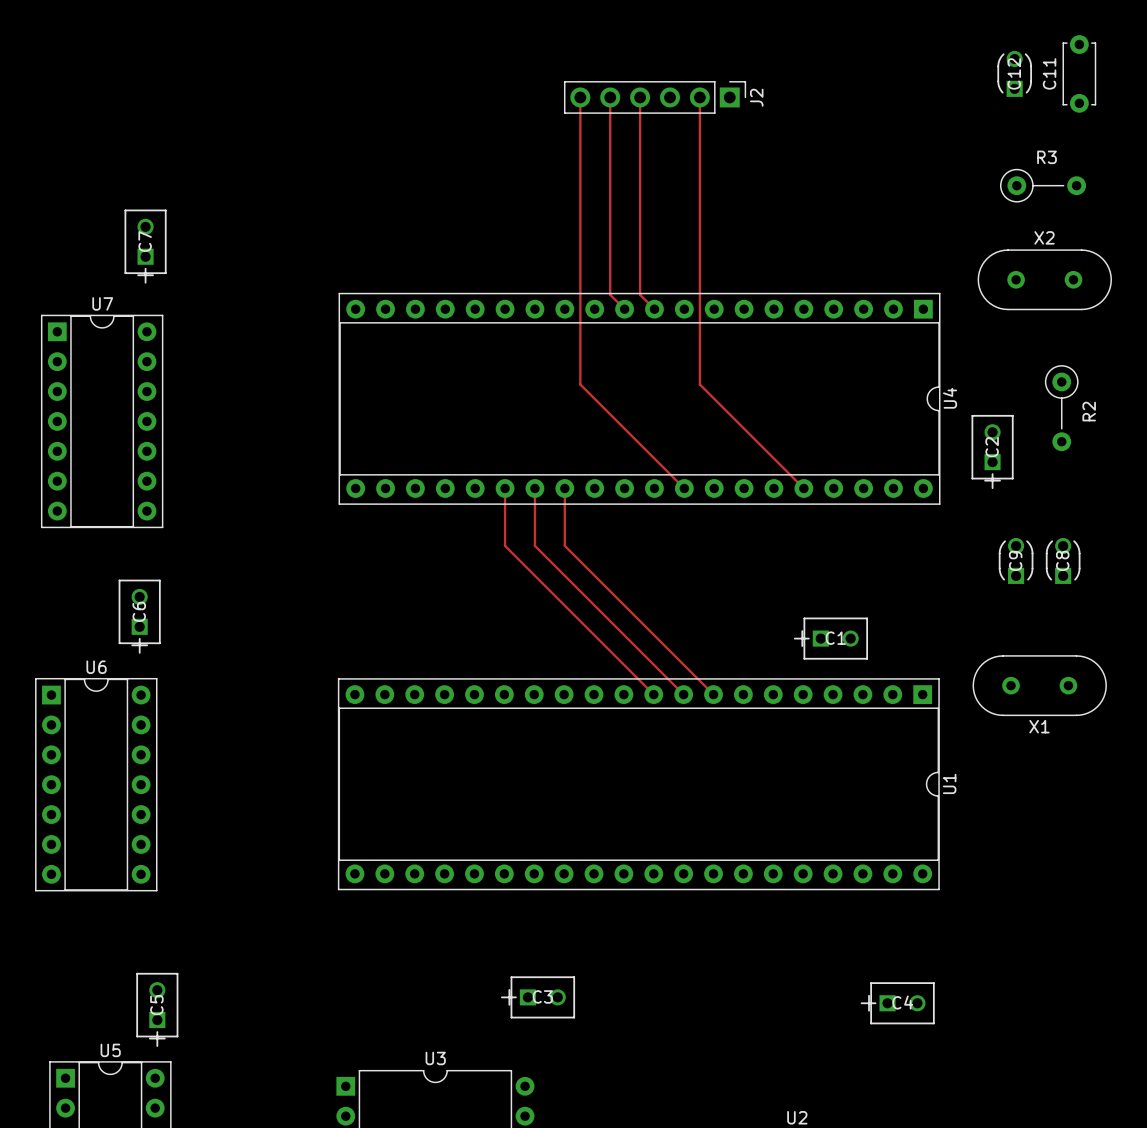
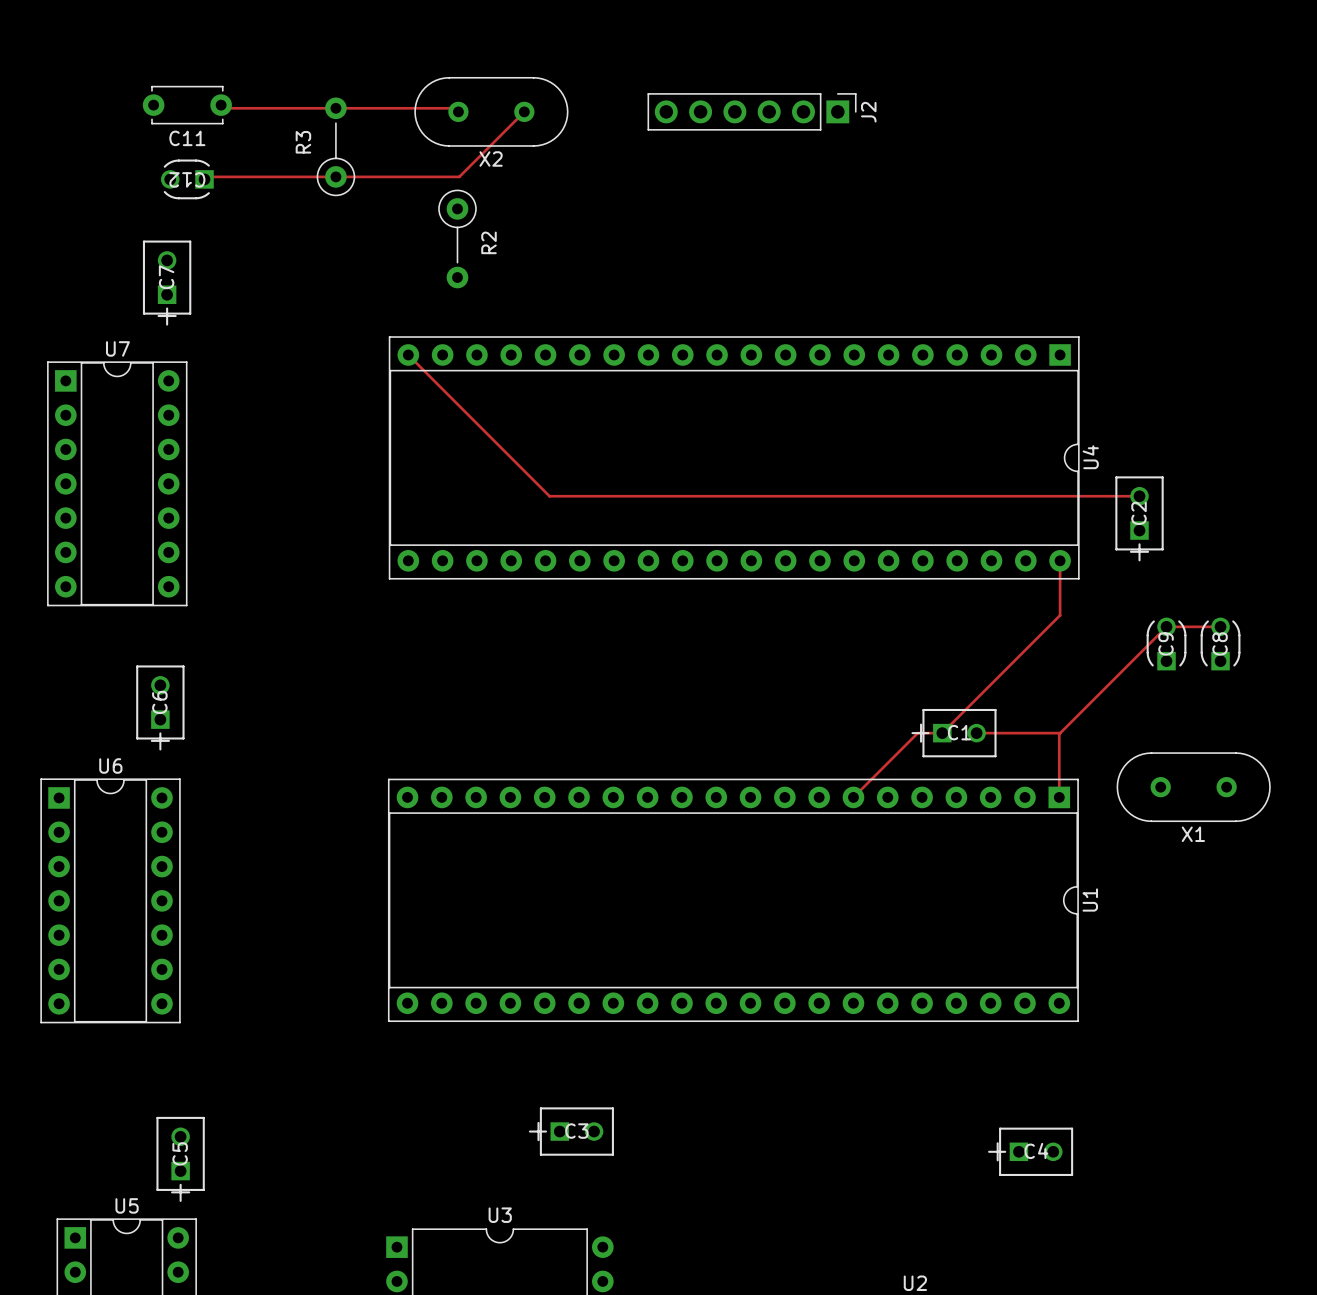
C12 rotation: 0° (1014, 73) -> 90° counterclockwise (187, 179)
C12 position: (1014, 73) -> (187, 179)
C11 name position: C11 (1049, 73) -> C11 (187, 138)
C11 rotation: 0° (1079, 73) -> 90° clockwise (187, 105)
C11 position: (1079, 73) -> (187, 105)
track: none -> (221, 105) (224, 108) (454, 108) (458, 111)
track: none -> (524, 111) (459, 176) (207, 176) (204, 179)
track: (580, 97) (580, 384) (684, 488) -> none
track: (610, 97) (610, 294) (624, 309) -> none
track: (640, 97) (640, 294) (654, 309) -> none
track: (699, 97) (699, 384) (803, 488) -> none
R3 rotation: 0° (1043, 185) -> 90° counterclockwise (335, 146)
R3 position: (1043, 185) -> (335, 146)
X2 name position: X2 (1044, 237) -> X2 (491, 158)
X2 position: (1044, 279) -> (491, 111)
track: none -> (408, 354) (549, 496) (1139, 496)
R2 position: (1061, 408) -> (457, 238)
track: (505, 488) (505, 545) (653, 694) -> none
track: (534, 488) (534, 545) (683, 694) -> none
track: (564, 488) (564, 545) (713, 694) -> none
track: none -> (1060, 560) (1060, 615) (942, 733) (917, 733) (853, 797)
track: none -> (1220, 626) (1166, 626) (1059, 734) (1059, 797)
track: none -> (976, 733) (1060, 733)
C3 position: (538, 997) -> (571, 1131)

